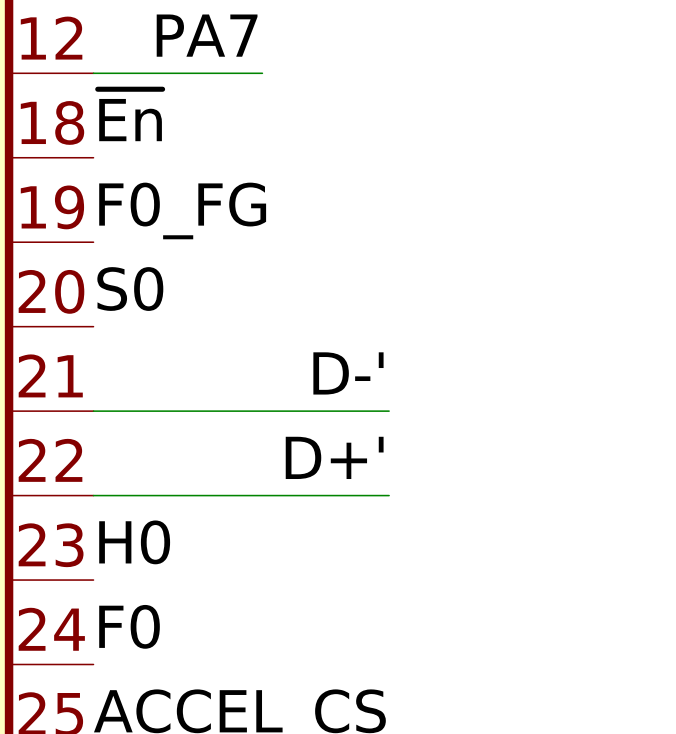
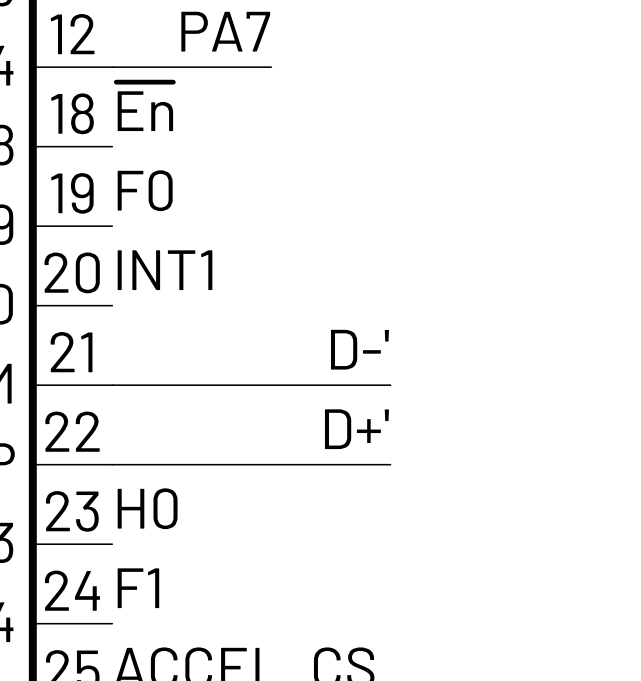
label: F0_FG (182, 210) -> F0 (145, 190)
label: S0 (130, 289) -> INT1 (165, 270)
label: F0 (129, 626) -> F1 (138, 588)

